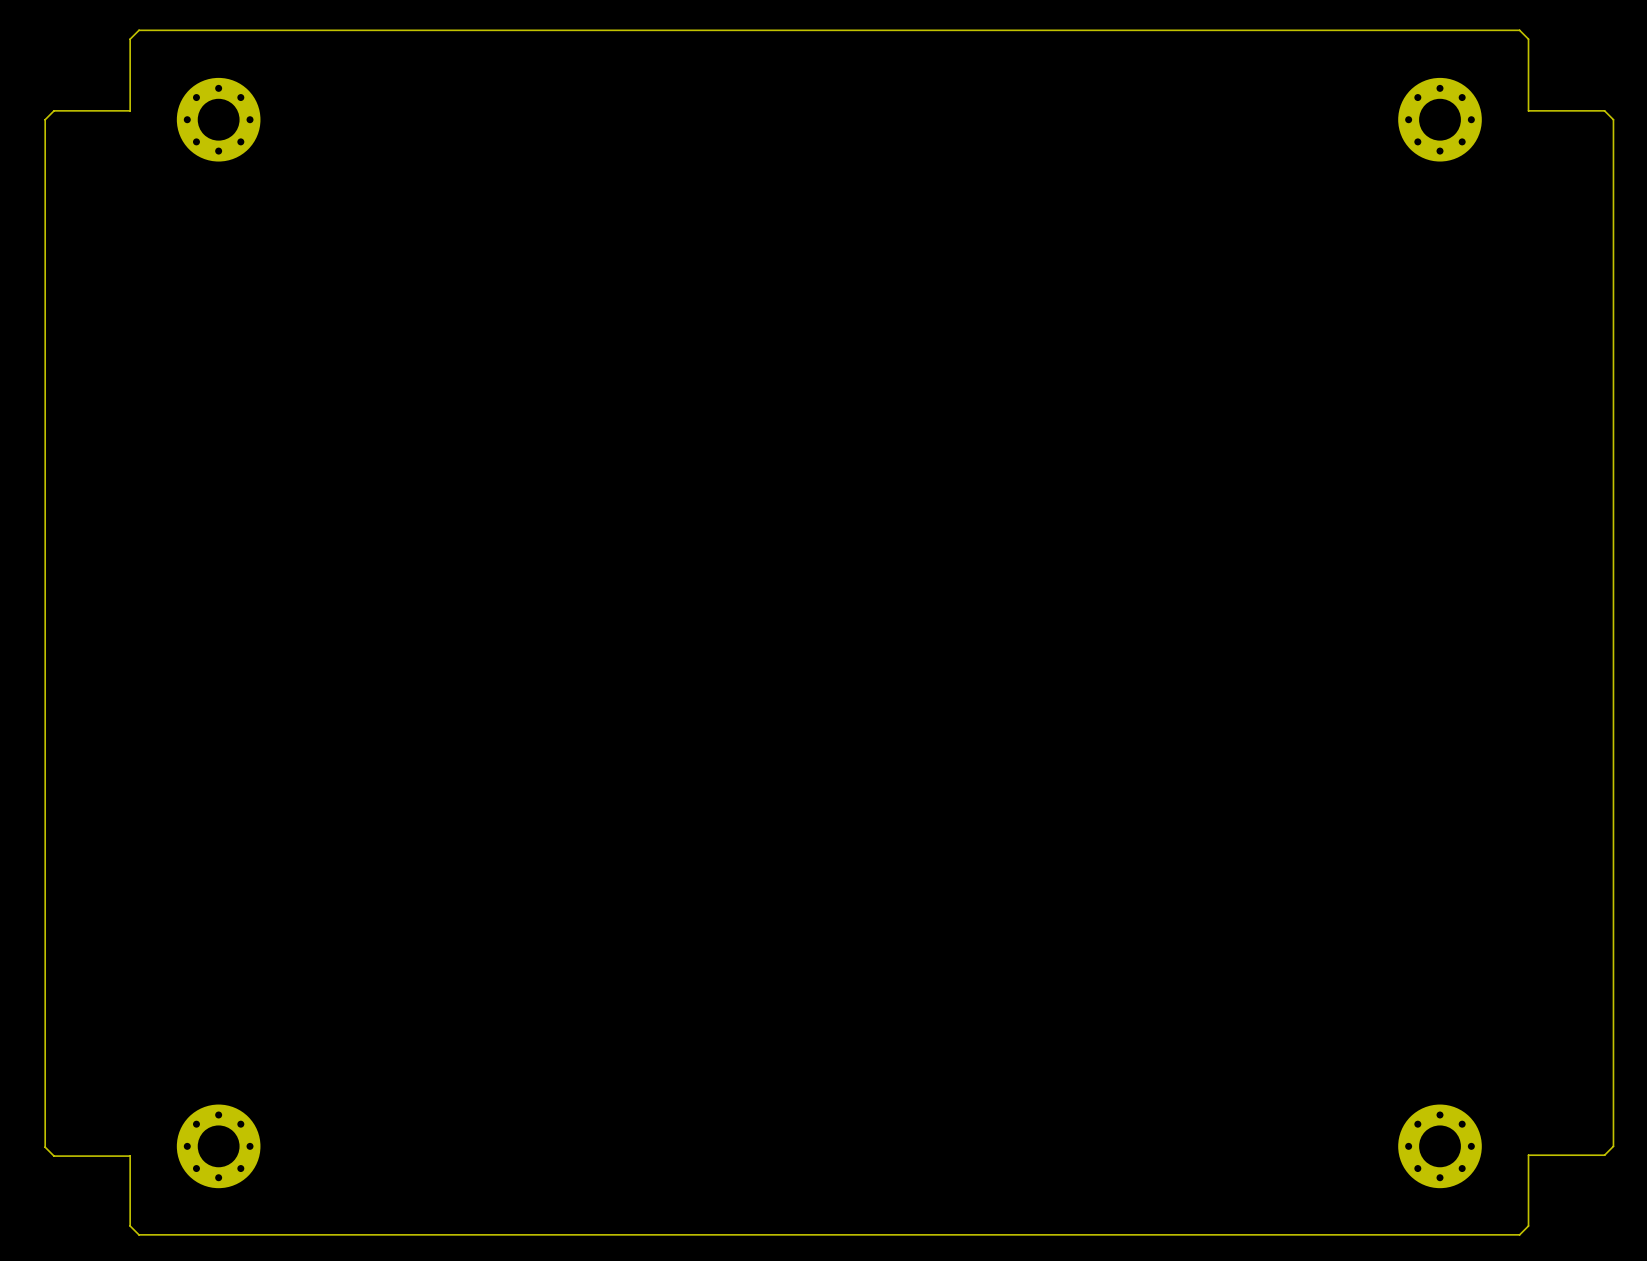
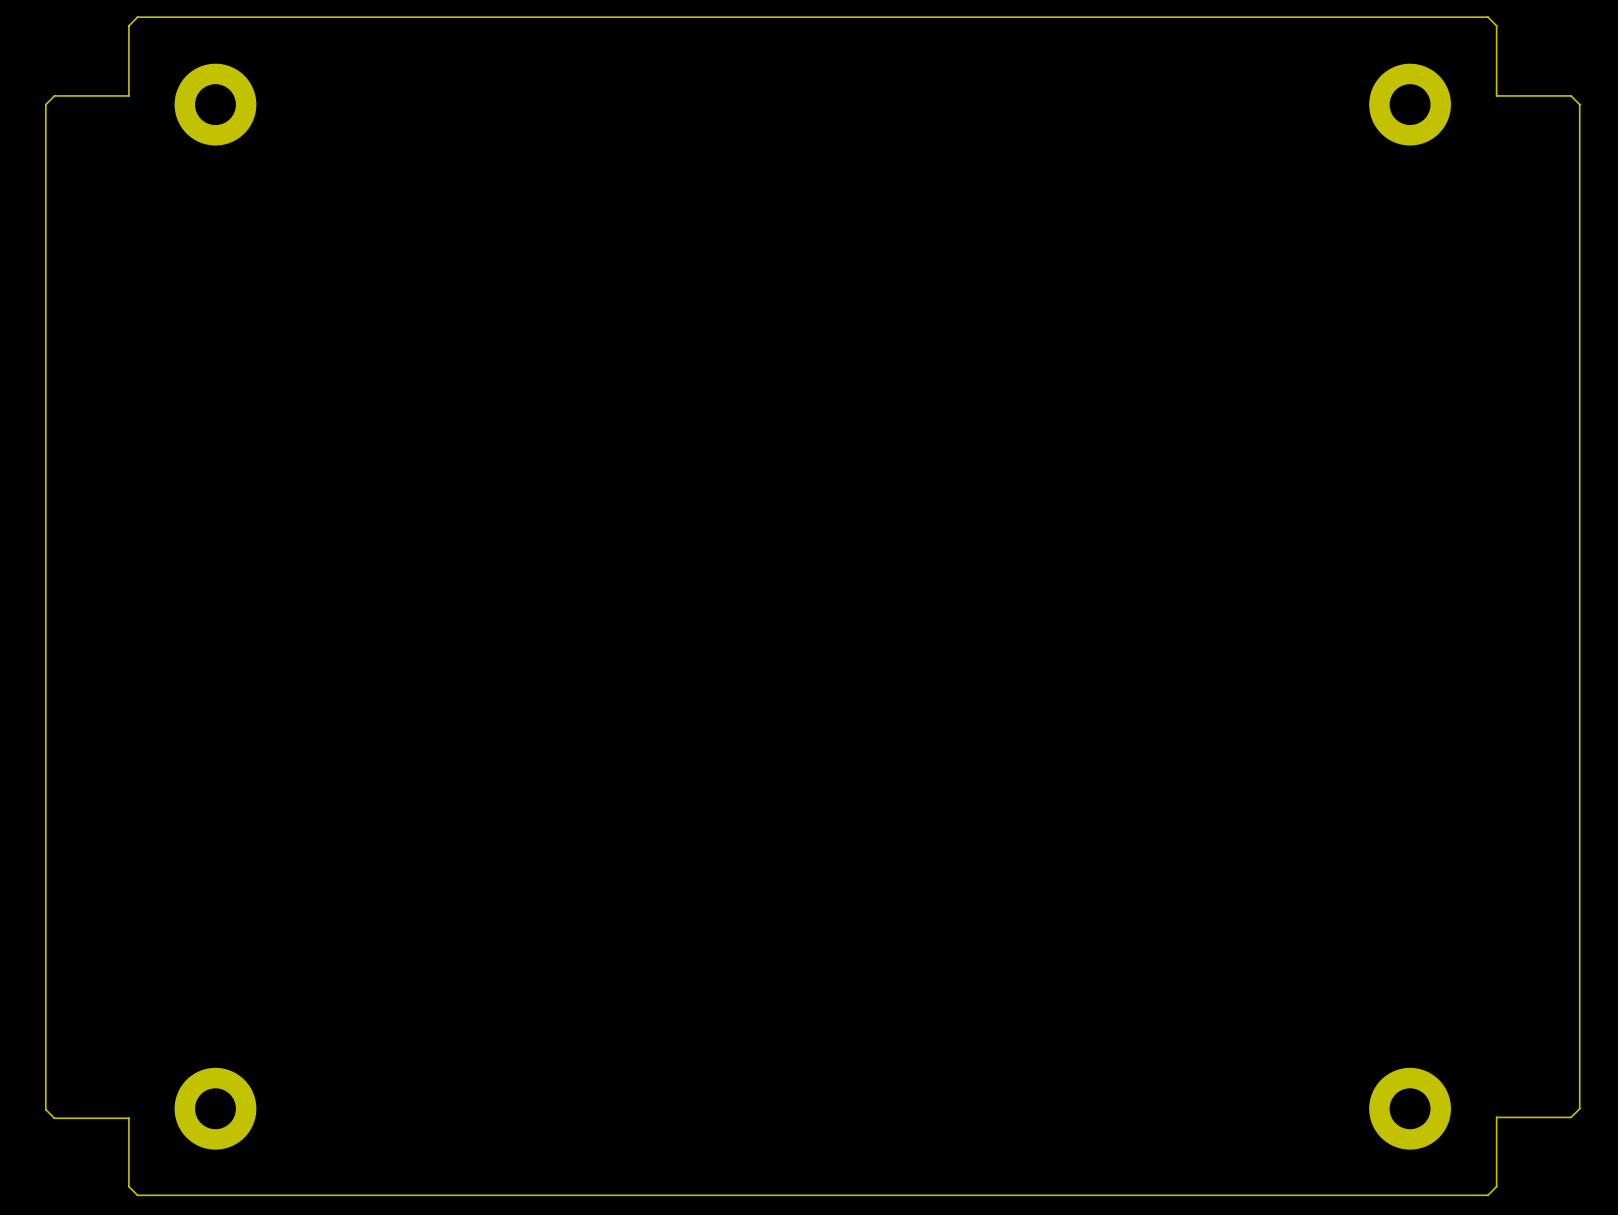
part footprint: [176, 77, 261, 162] -> [174, 63, 257, 146]
part footprint: [1398, 77, 1482, 162] -> [1369, 63, 1451, 146]
part footprint: [176, 1104, 261, 1189] -> [174, 1067, 257, 1150]
part footprint: [1398, 1104, 1482, 1189] -> [1369, 1067, 1451, 1150]

